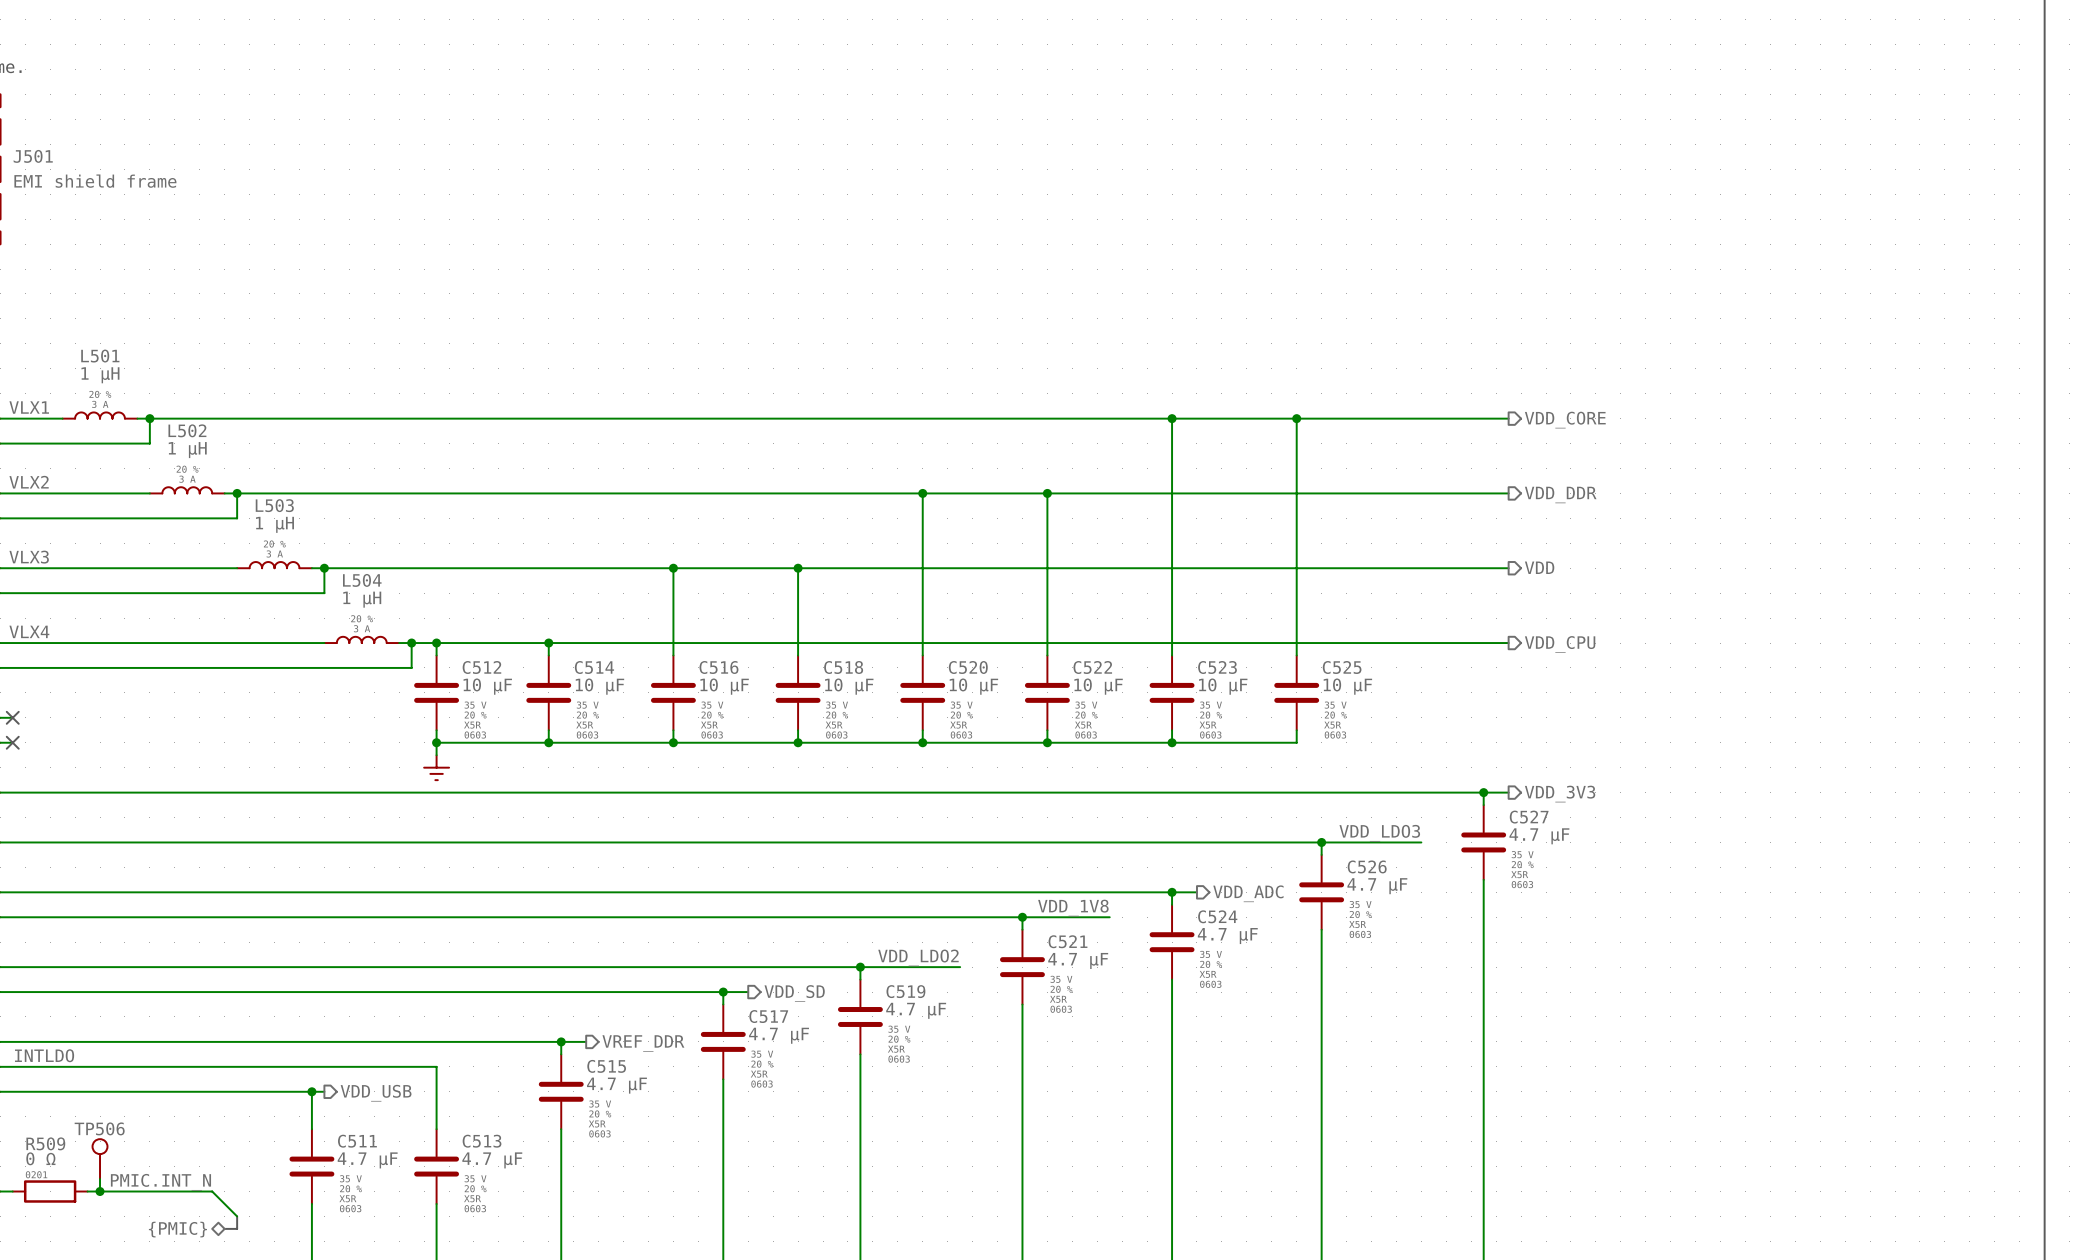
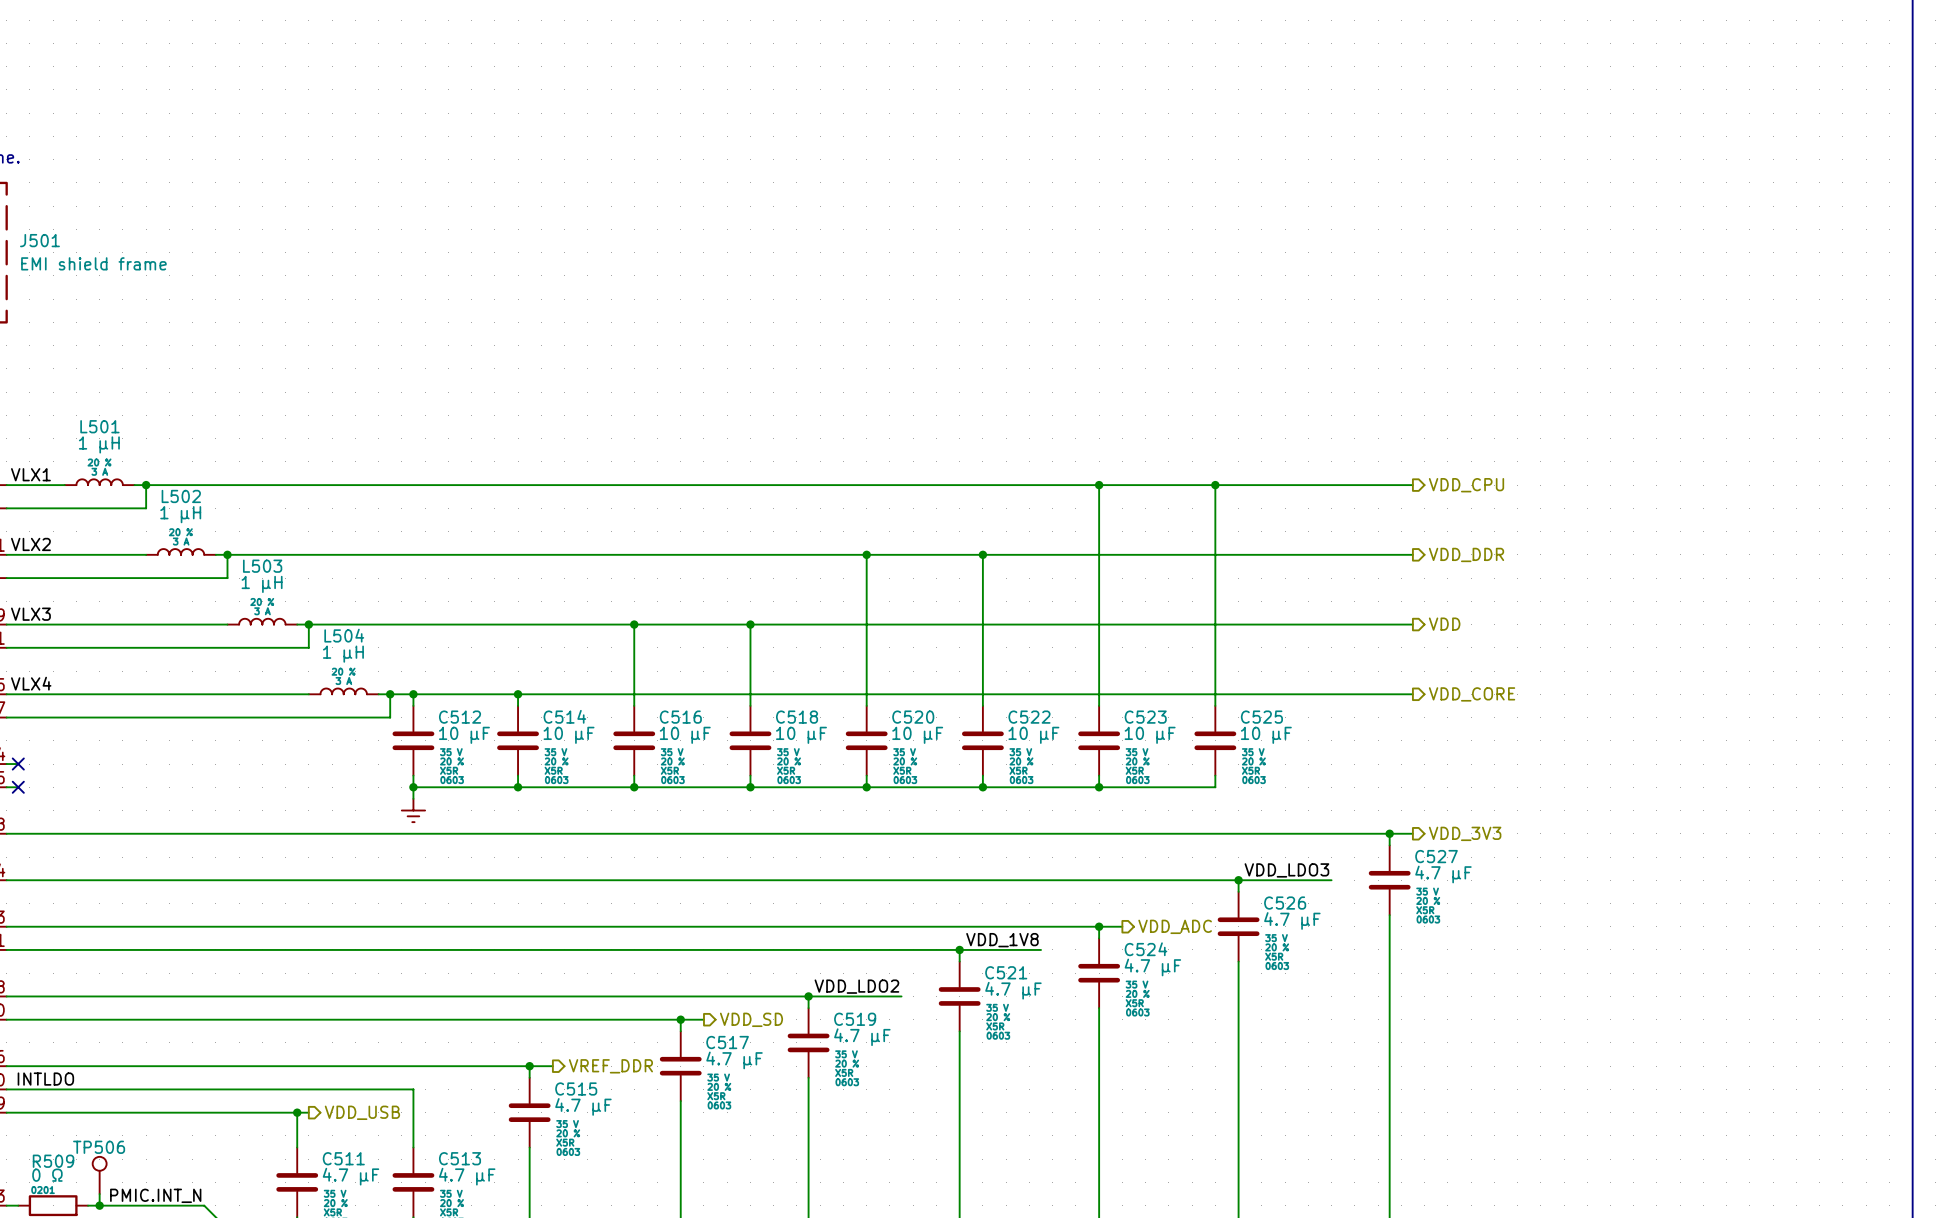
hierarchical label: VDD_CORE (1565, 420) -> VDD_CPU (1466, 485)
hierarchical label: VDD_CPU (1560, 644) -> VDD_CORE (1472, 694)

